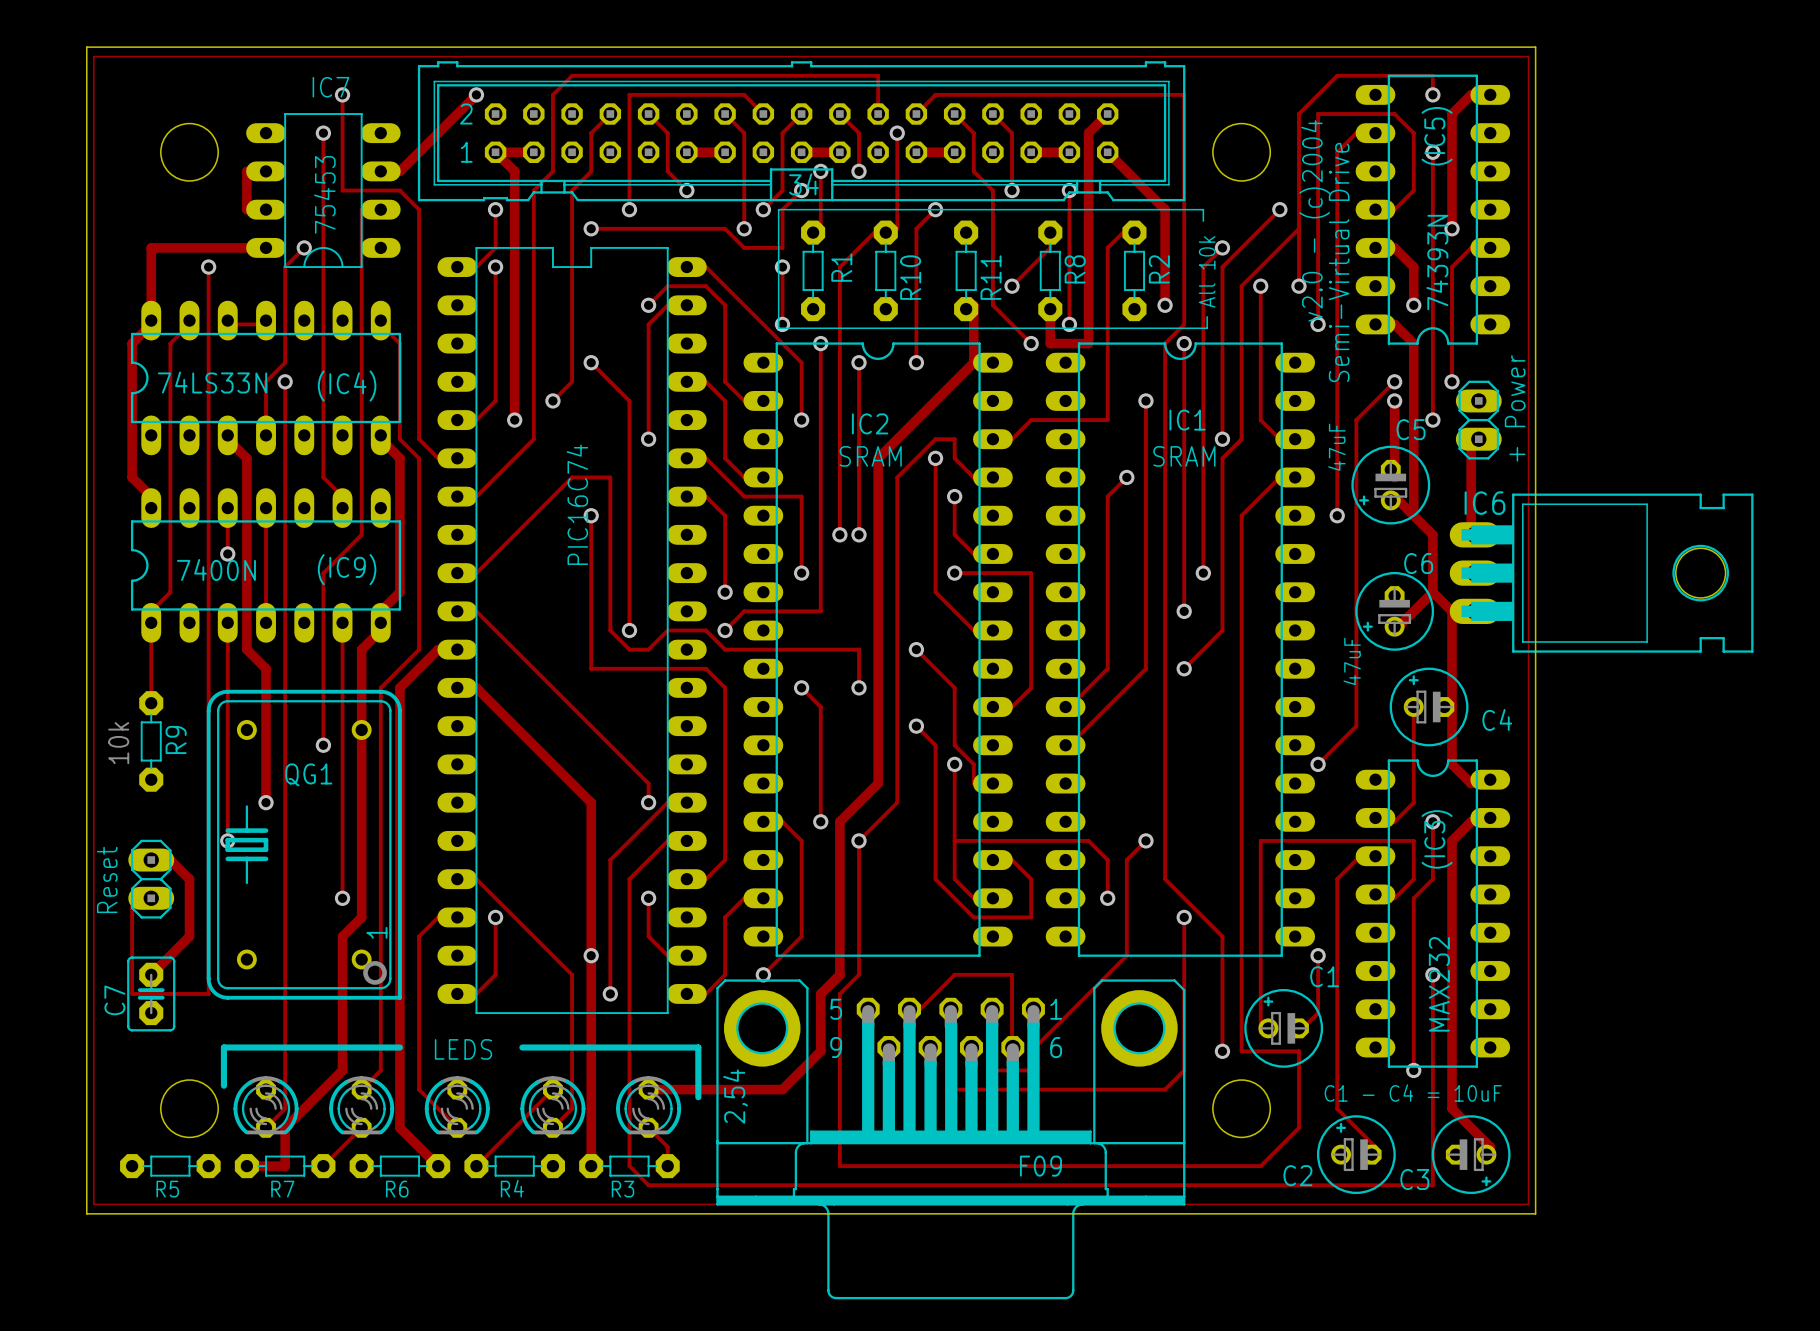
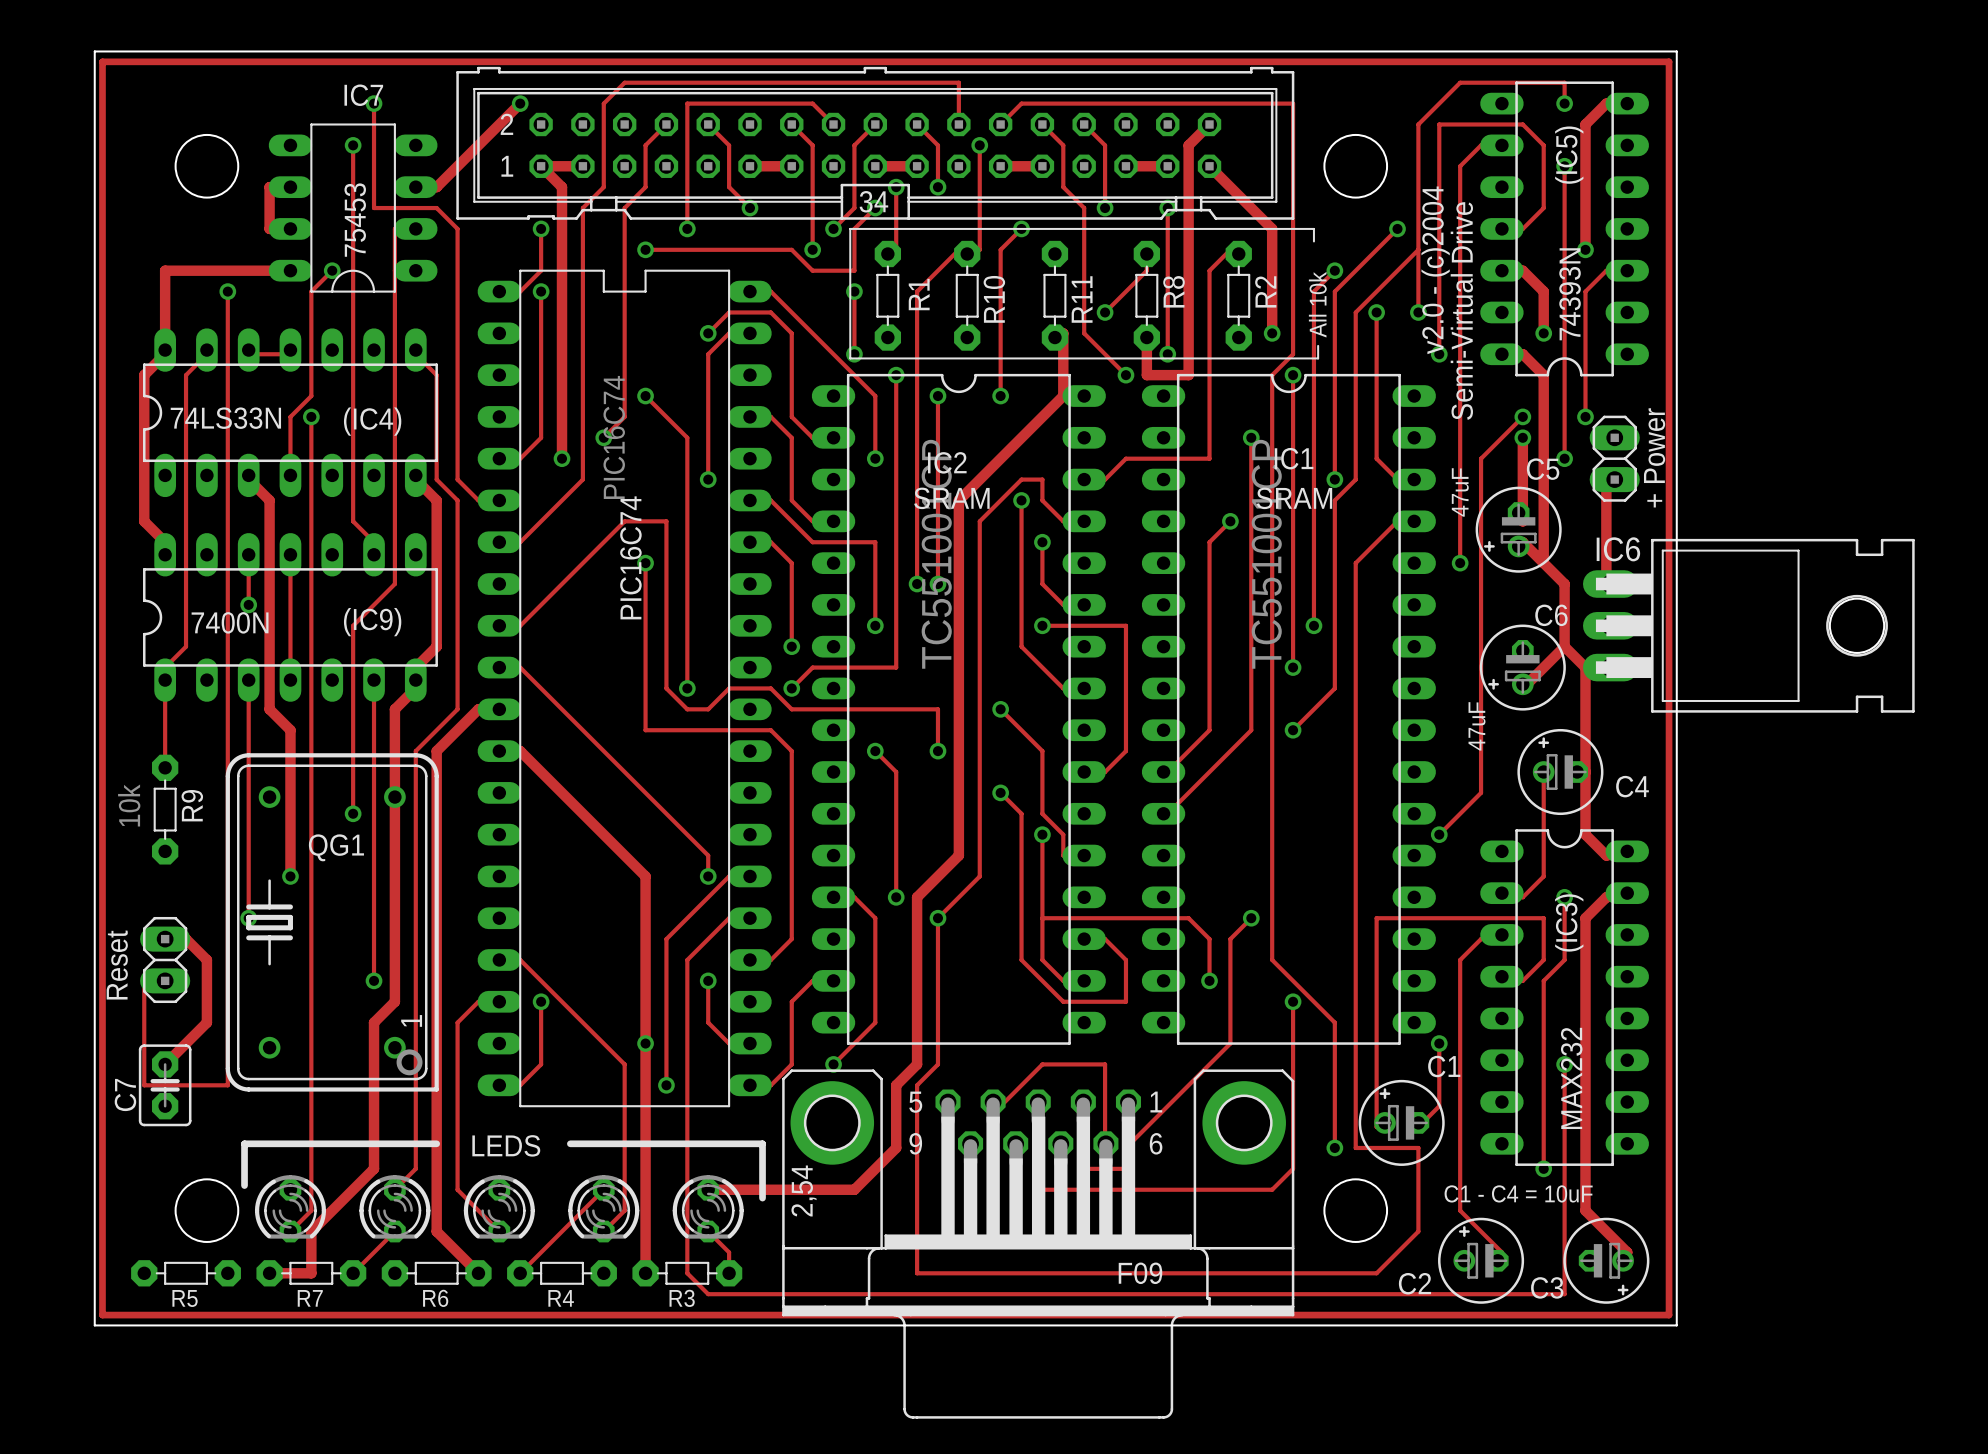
track width: thin (93, 56) (1528, 56) (1528, 1204) (93, 1204) (93, 56) -> thick (102, 61) (1669, 61) (1669, 1315) (102, 1315) (102, 61)
PIC16C74 value: none -> PIC16C74 (614, 437)
IC2 value: none -> TC551001CP (936, 554)
IC1 value: none -> TC551001CP (1266, 554)

